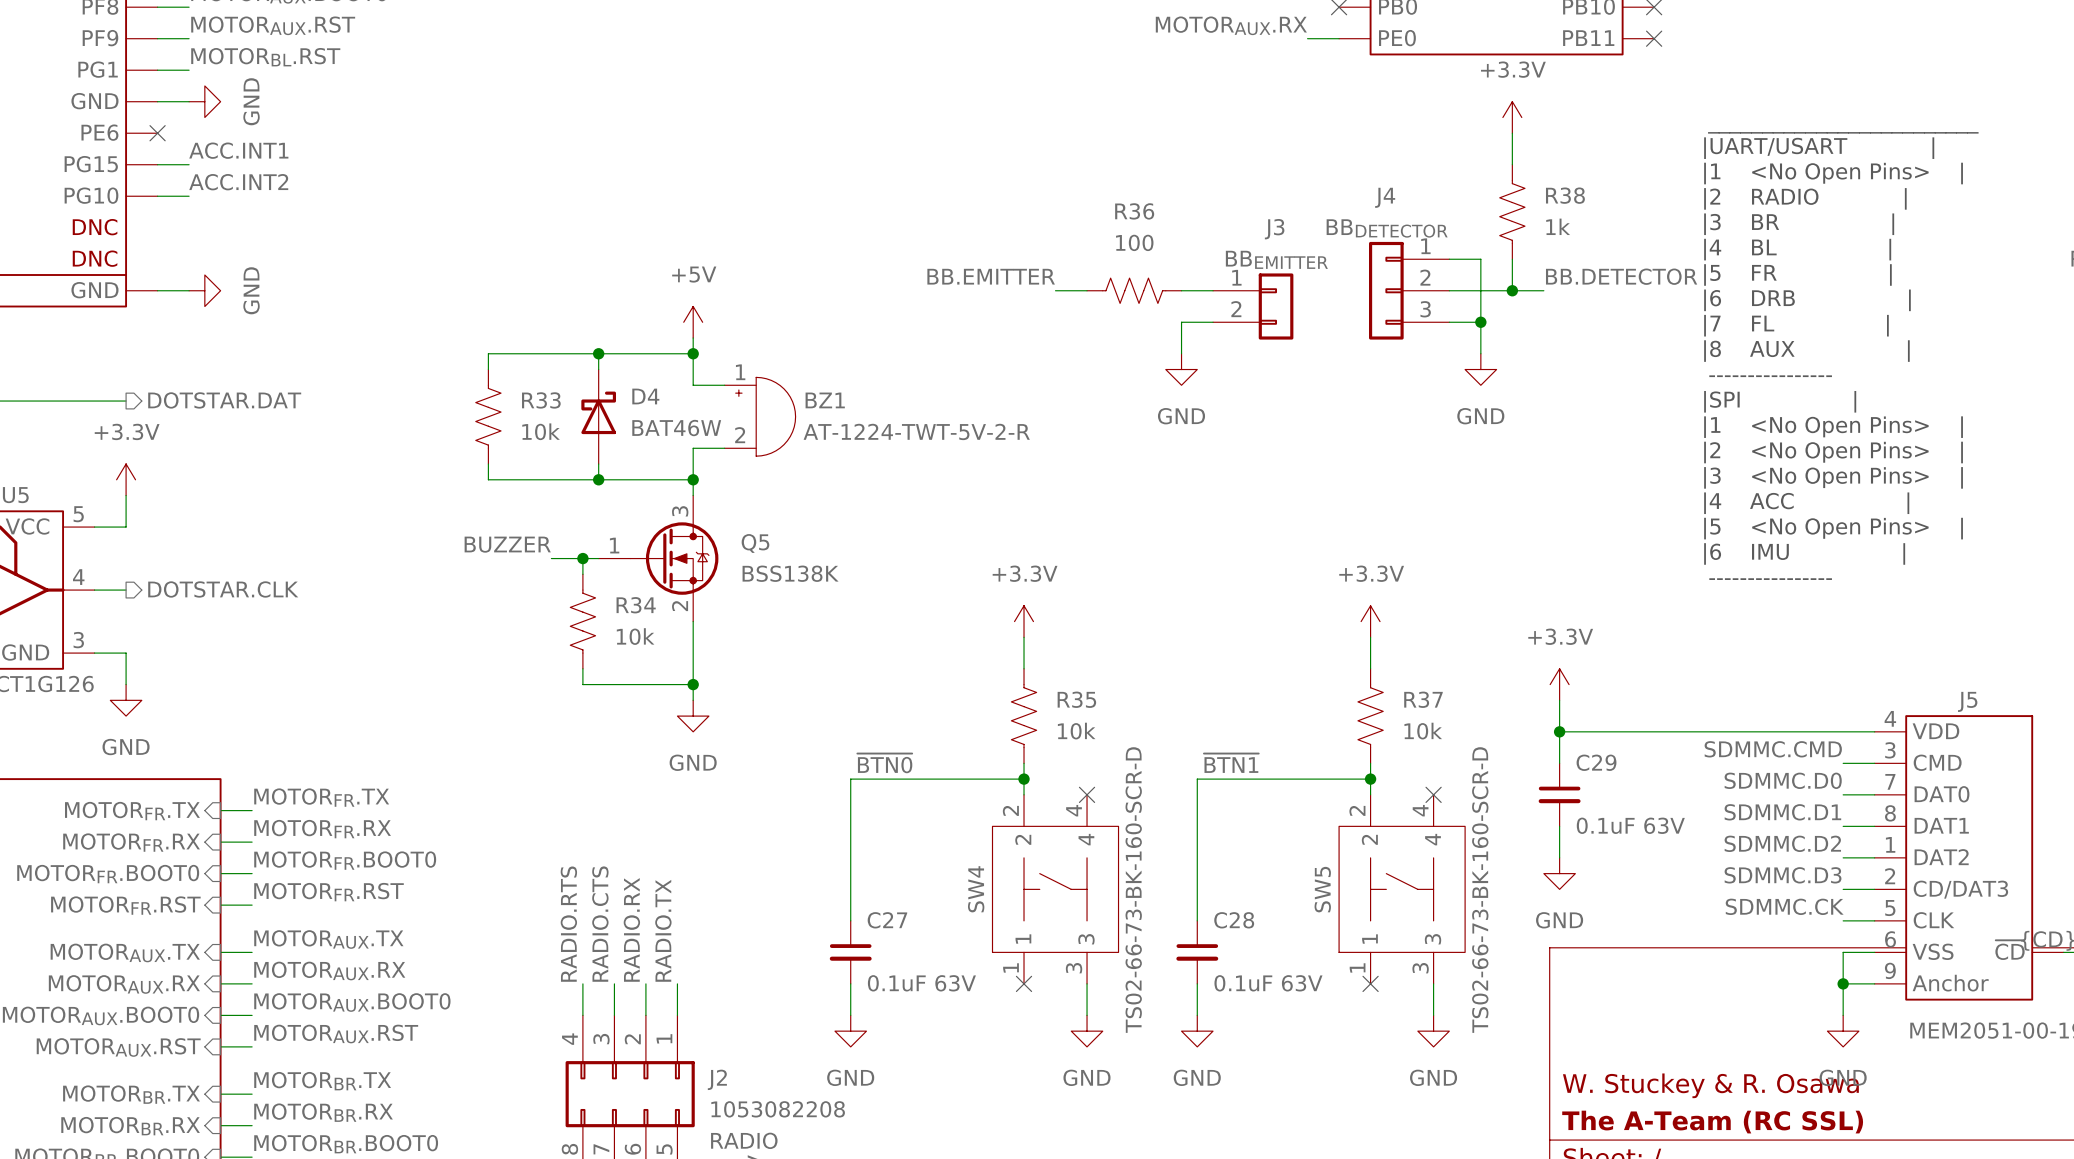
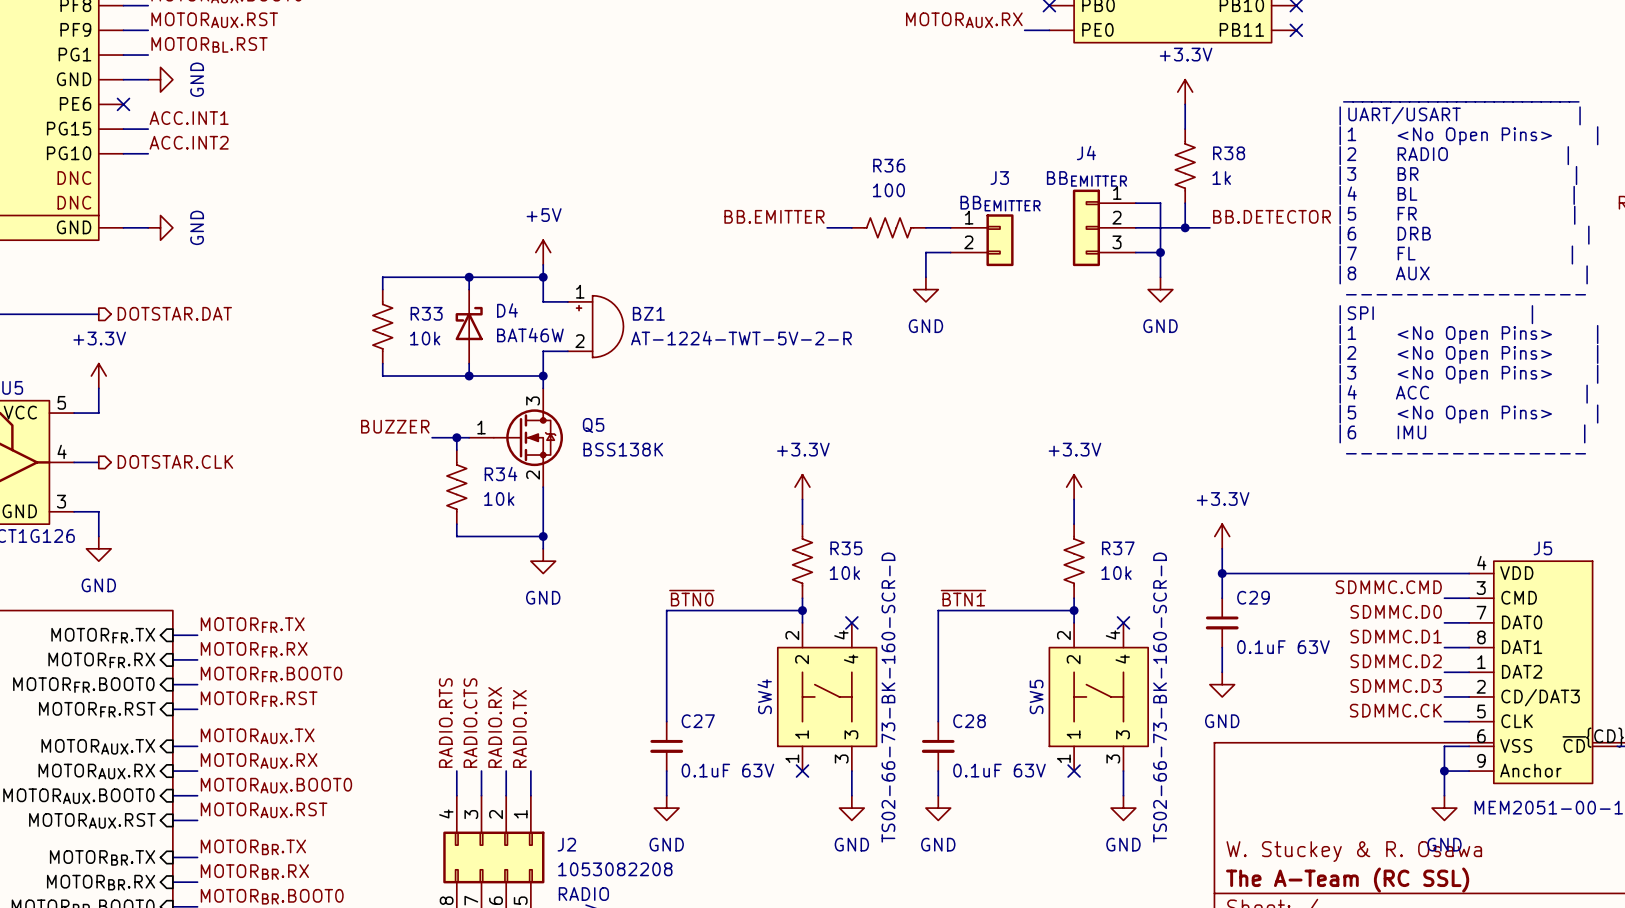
J4 value: BBDETECTOR (1387, 228) -> BBEMITTER (1086, 178)

